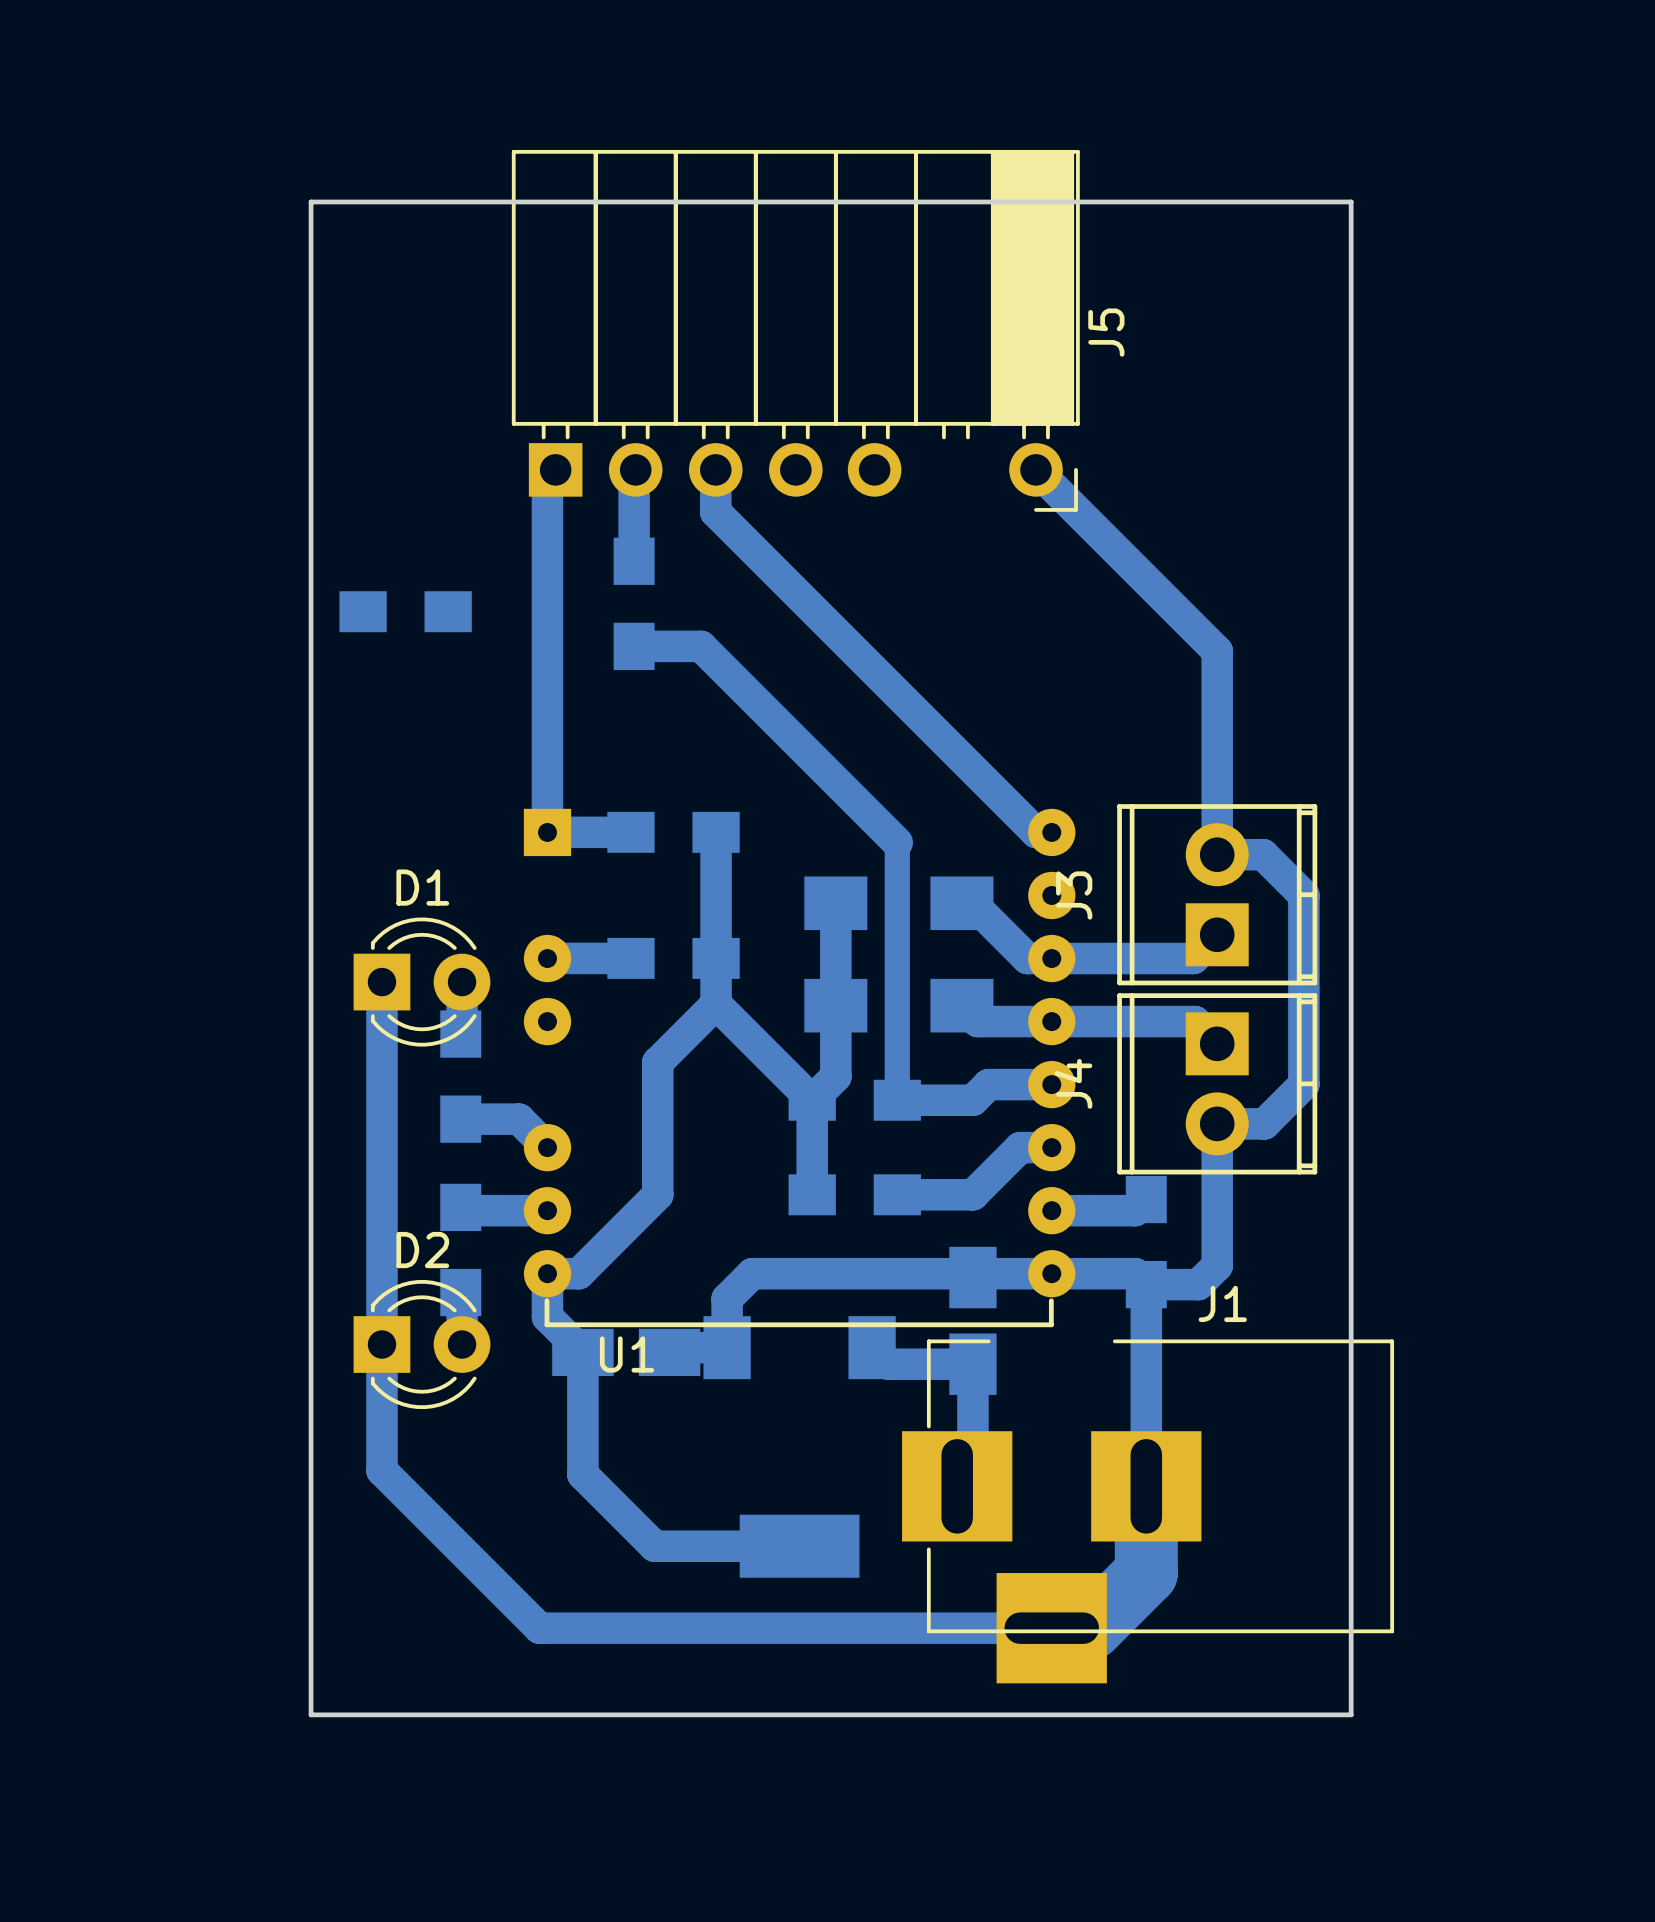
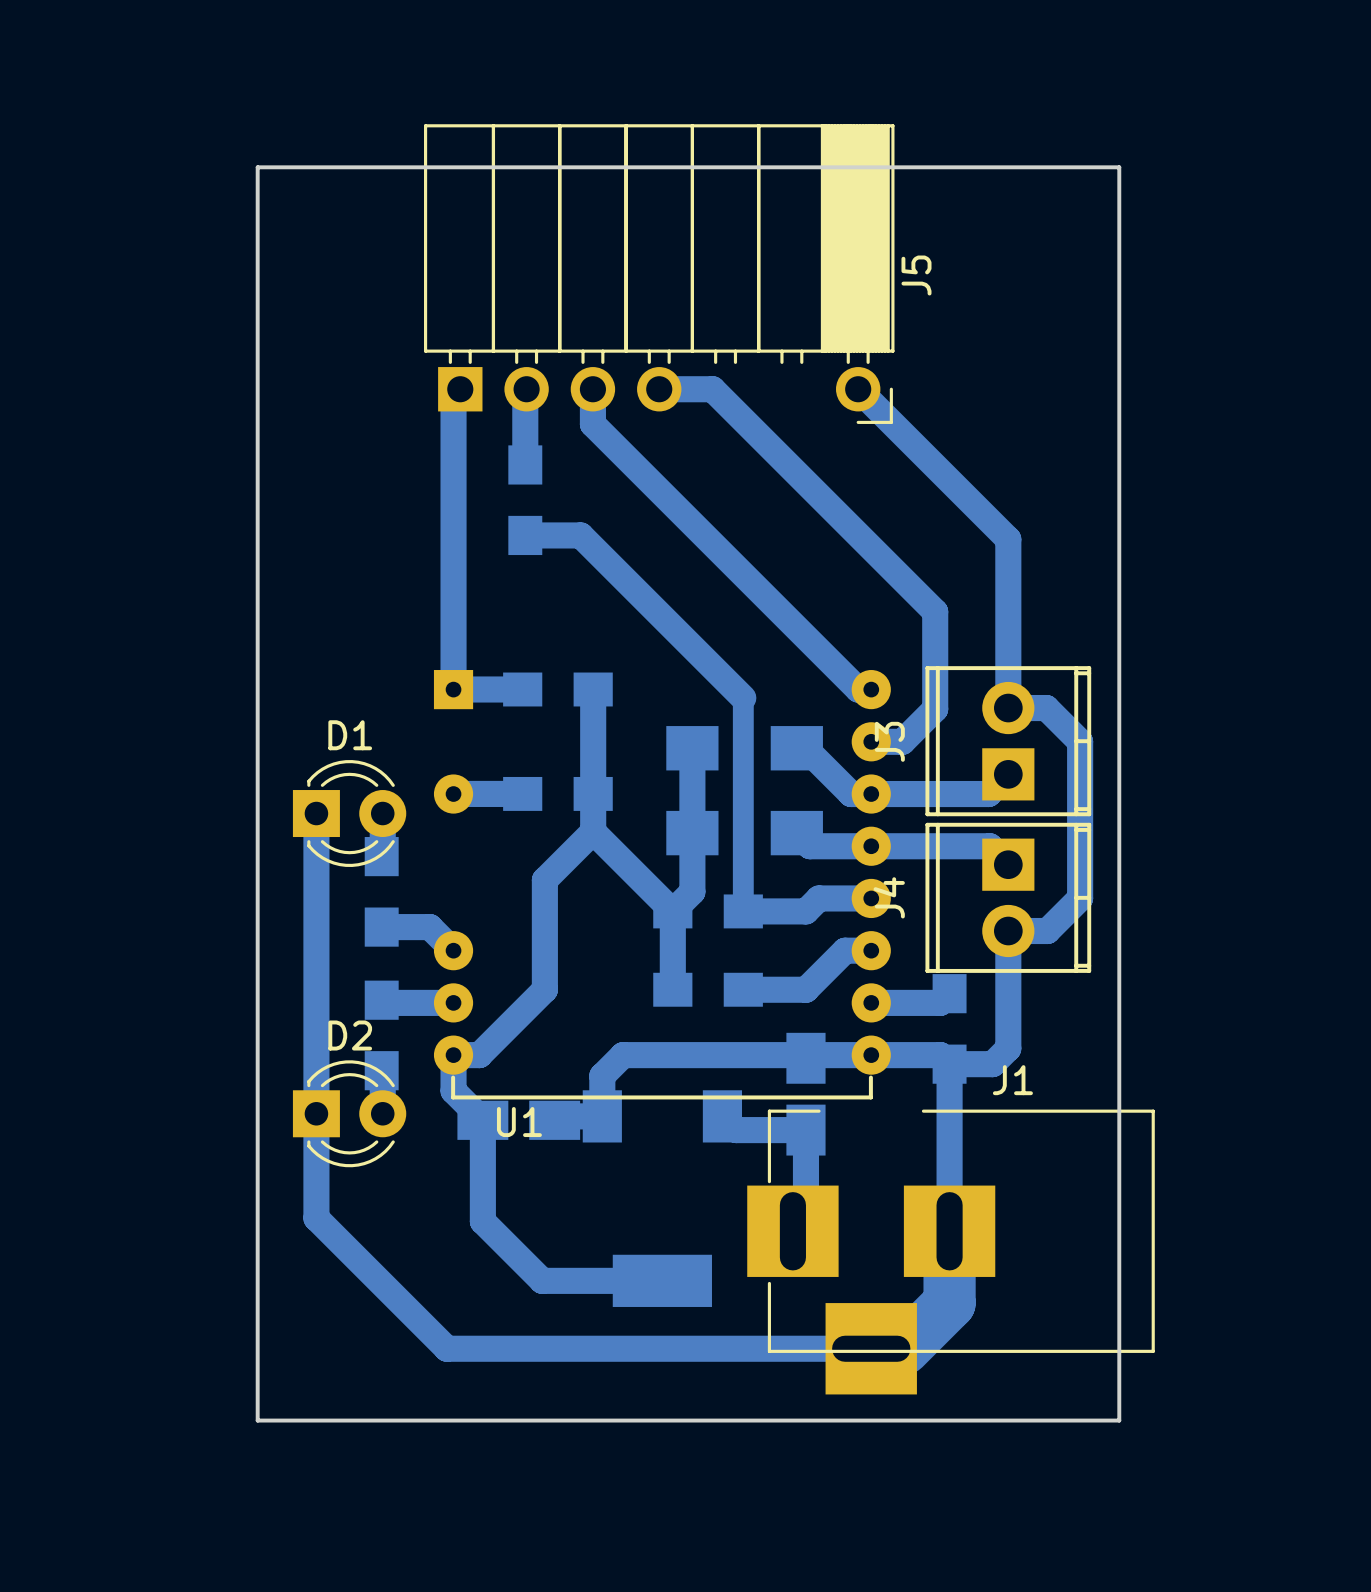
J5 footprint: [511, 149, 1080, 512] -> [424, 124, 895, 424]
bottom track: none -> (659, 389) (712, 389) (935, 611) (935, 709) (902, 741) (871, 741)
part: (405, 611) -> none
U1 footprint: [523, 808, 1076, 1328] -> [433, 670, 891, 1100]

